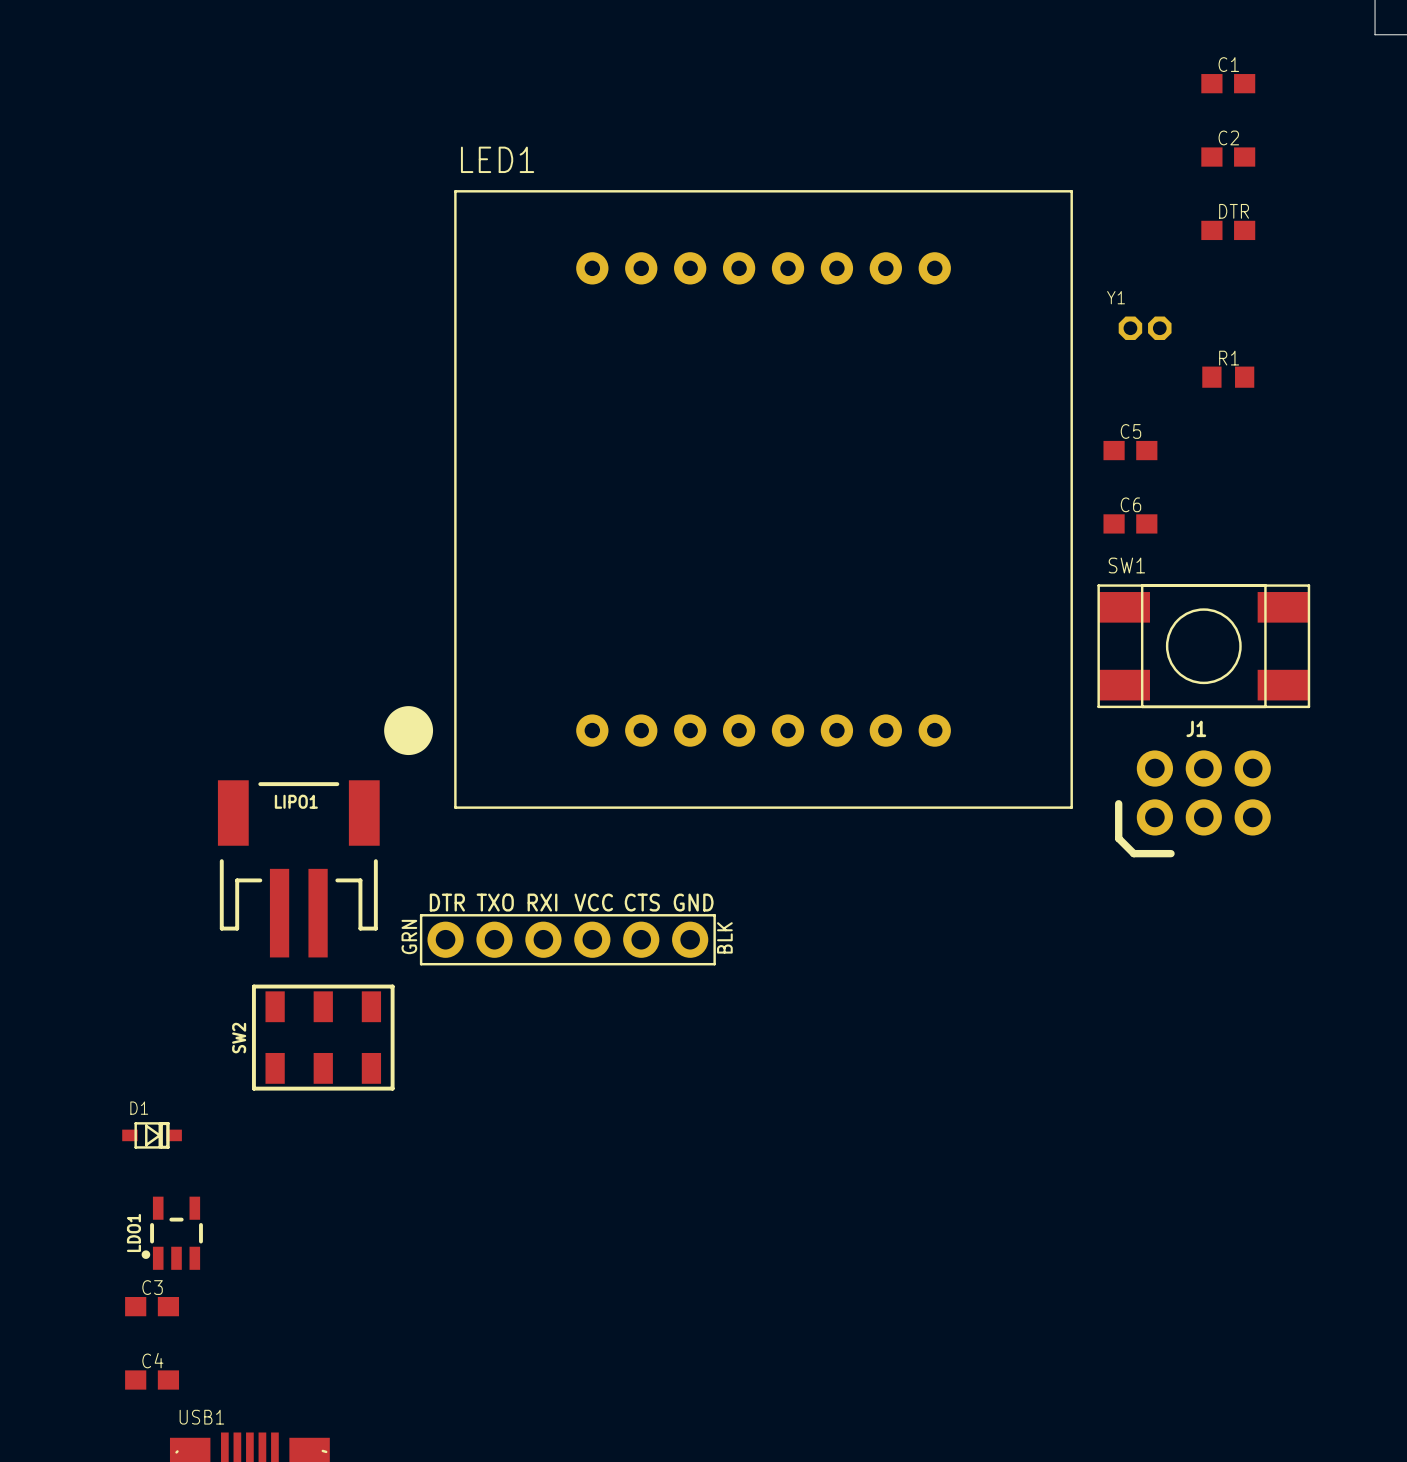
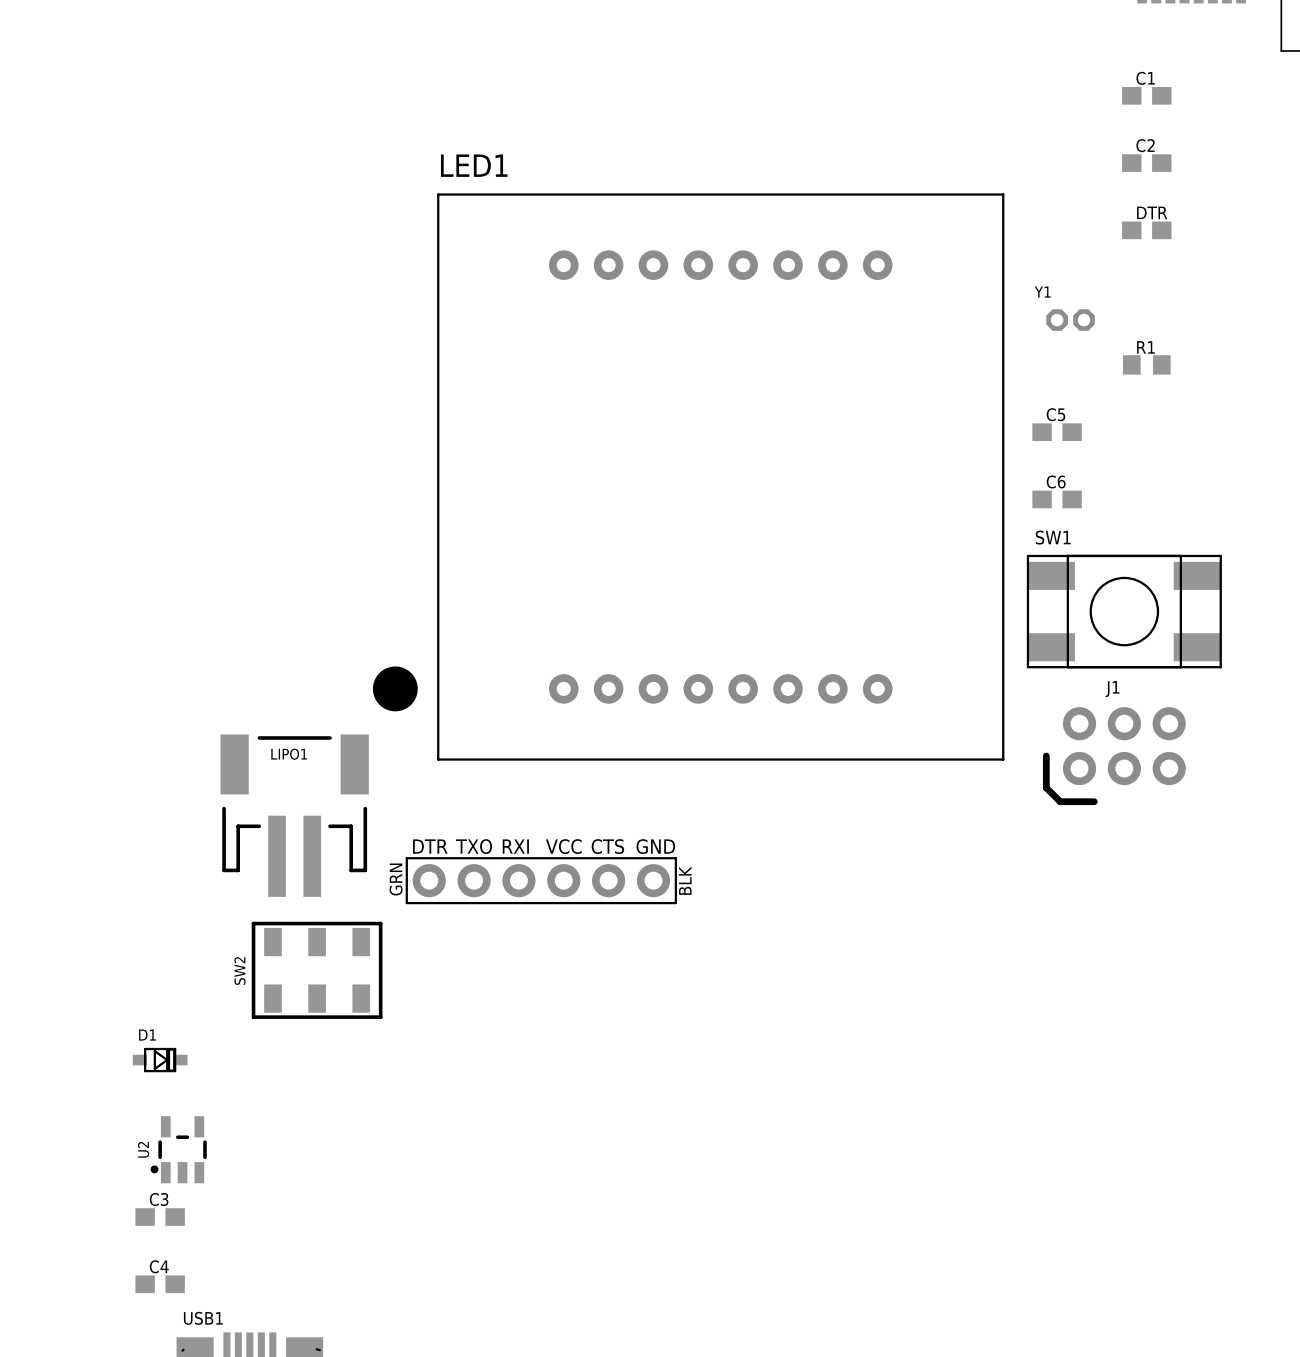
LDO1 name: LDO1 (133, 1233) -> U2 (143, 1149)

